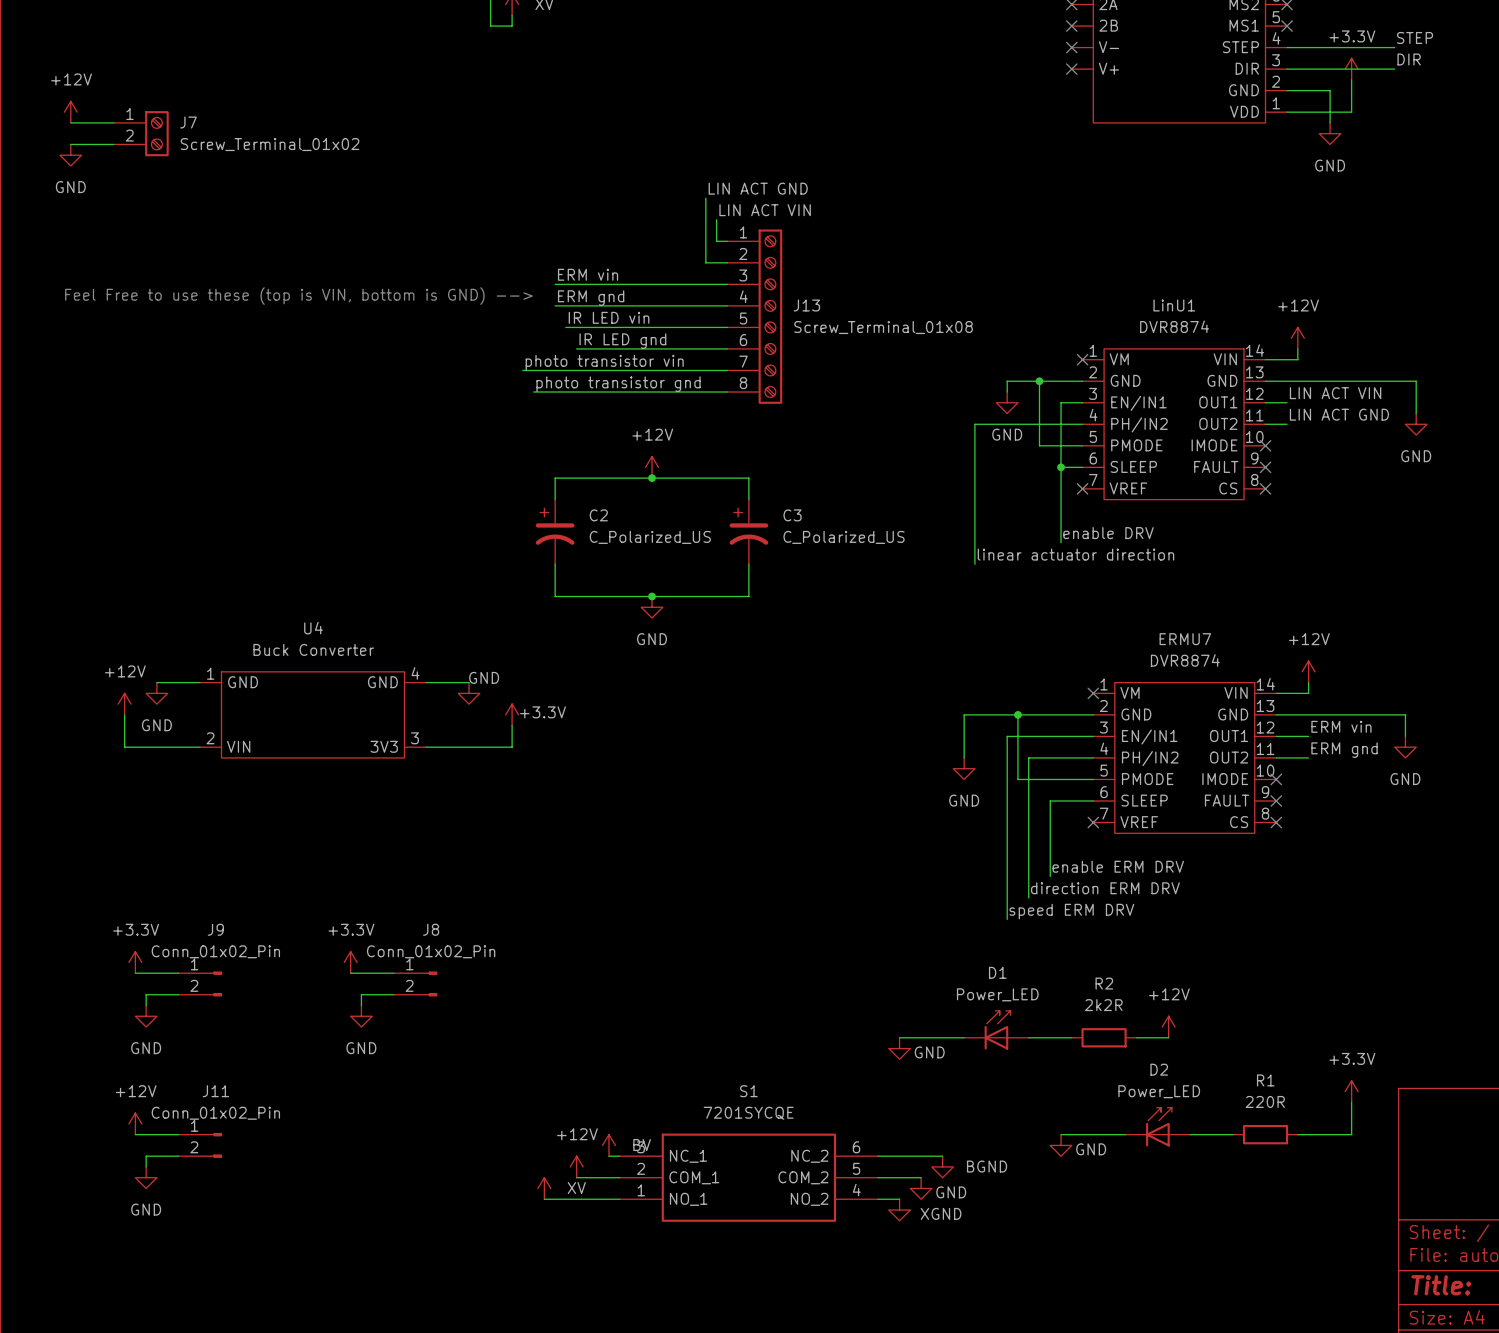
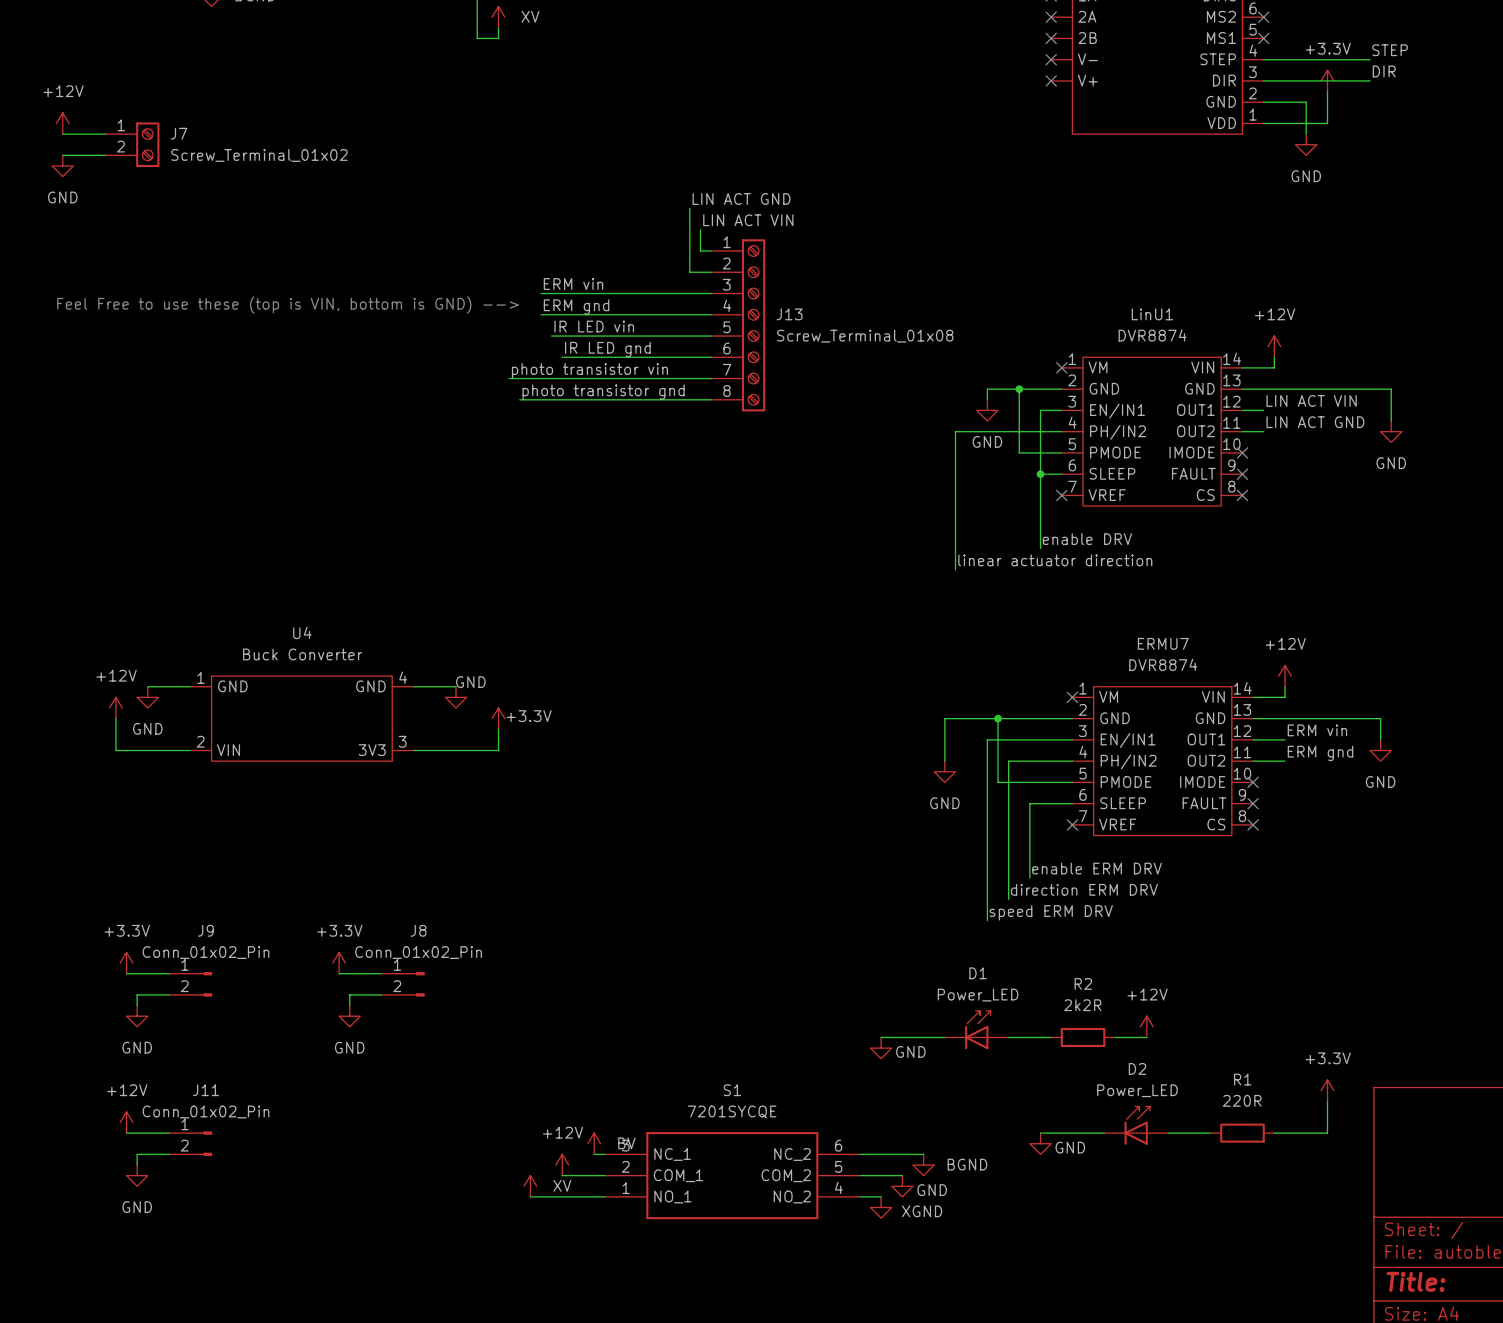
power symbol: +12V (652, 467) -> none
junction: (652, 478) -> none
wire: (555, 499) (555, 478) (748, 478) (748, 499) -> none
C2: C_Polarized_US (555, 531) -> none
C3: C_Polarized_US (748, 531) -> none
wire: (555, 564) (555, 596) (748, 596) (748, 564) -> none
junction: (652, 596) -> none
power symbol: GND (652, 607) -> none

